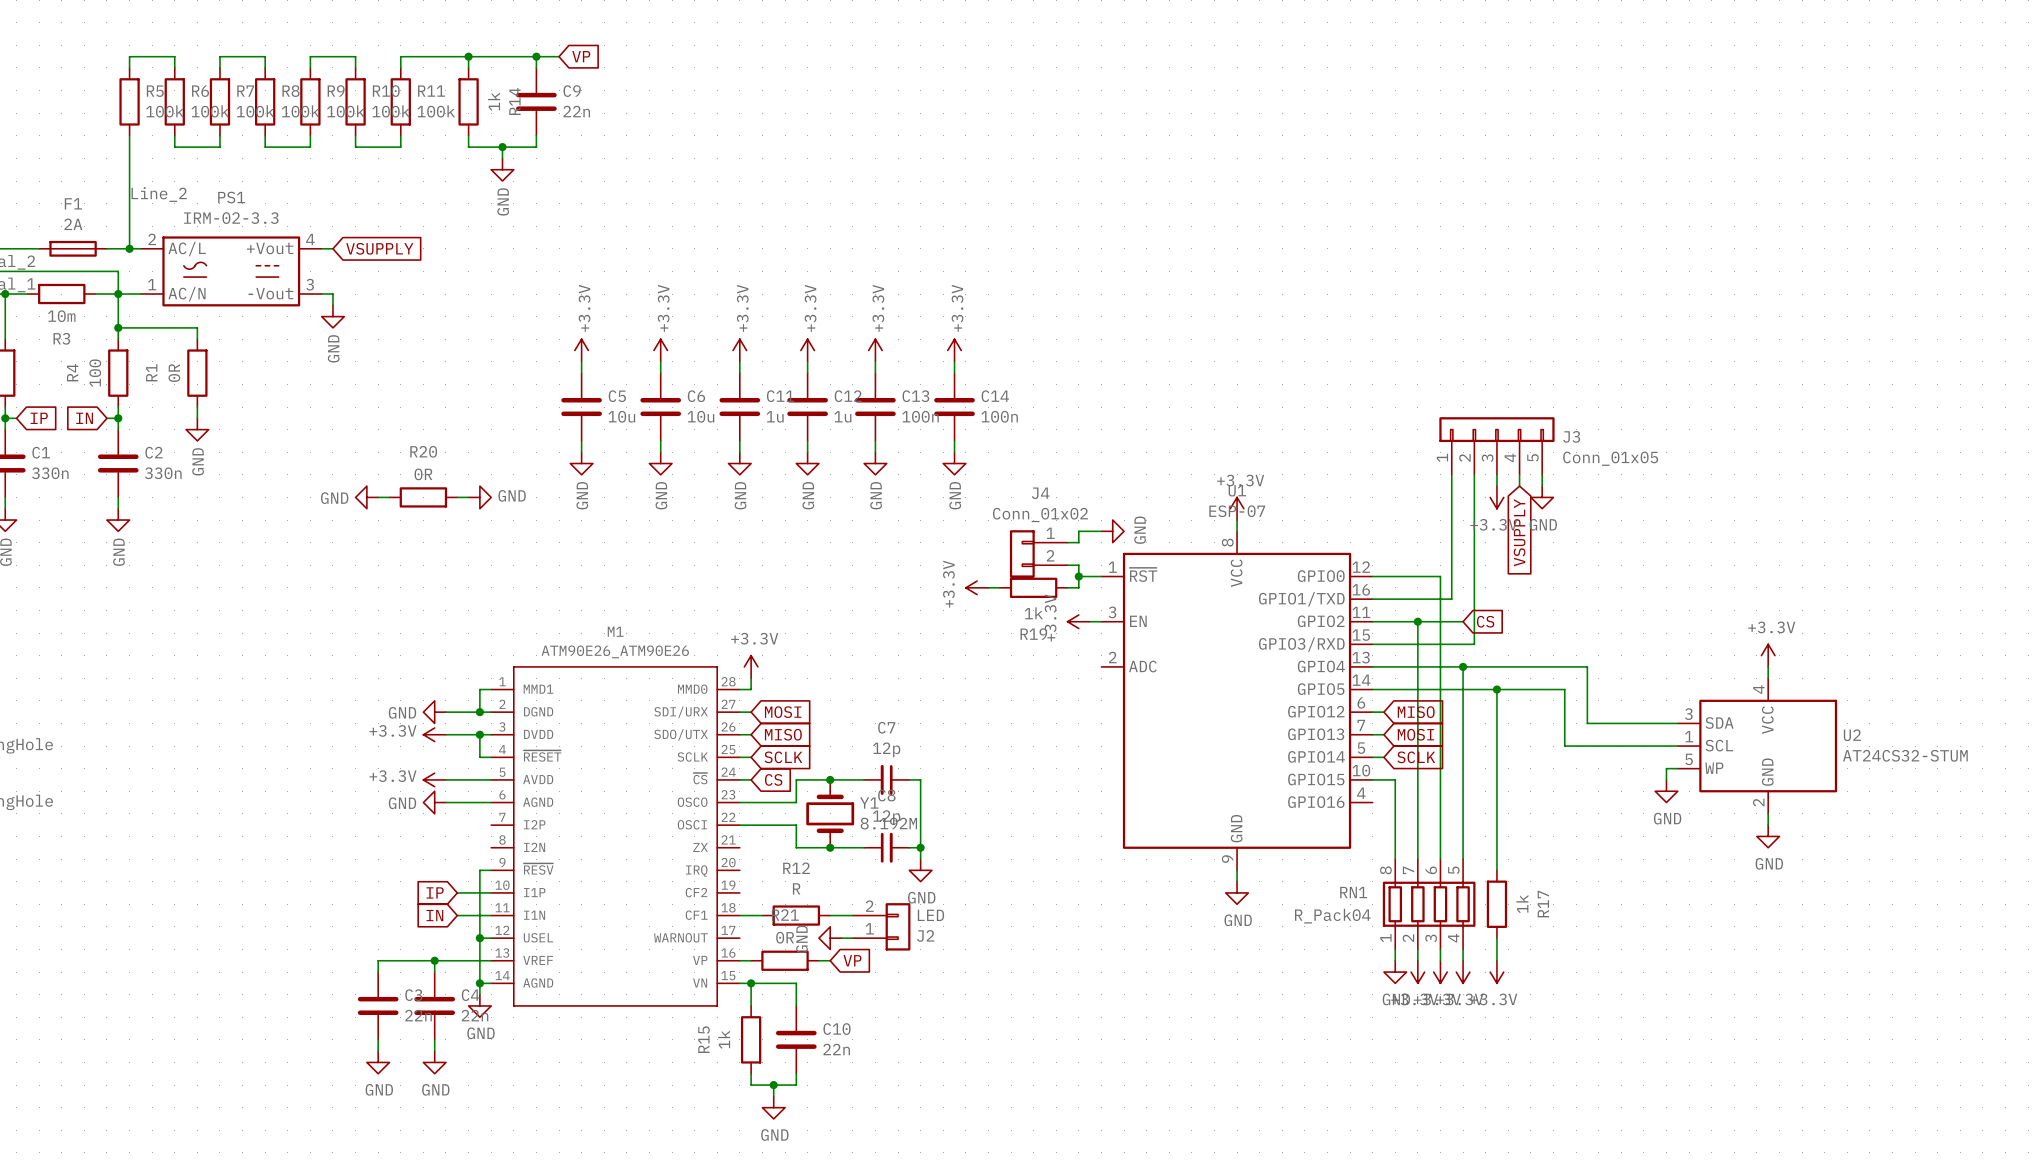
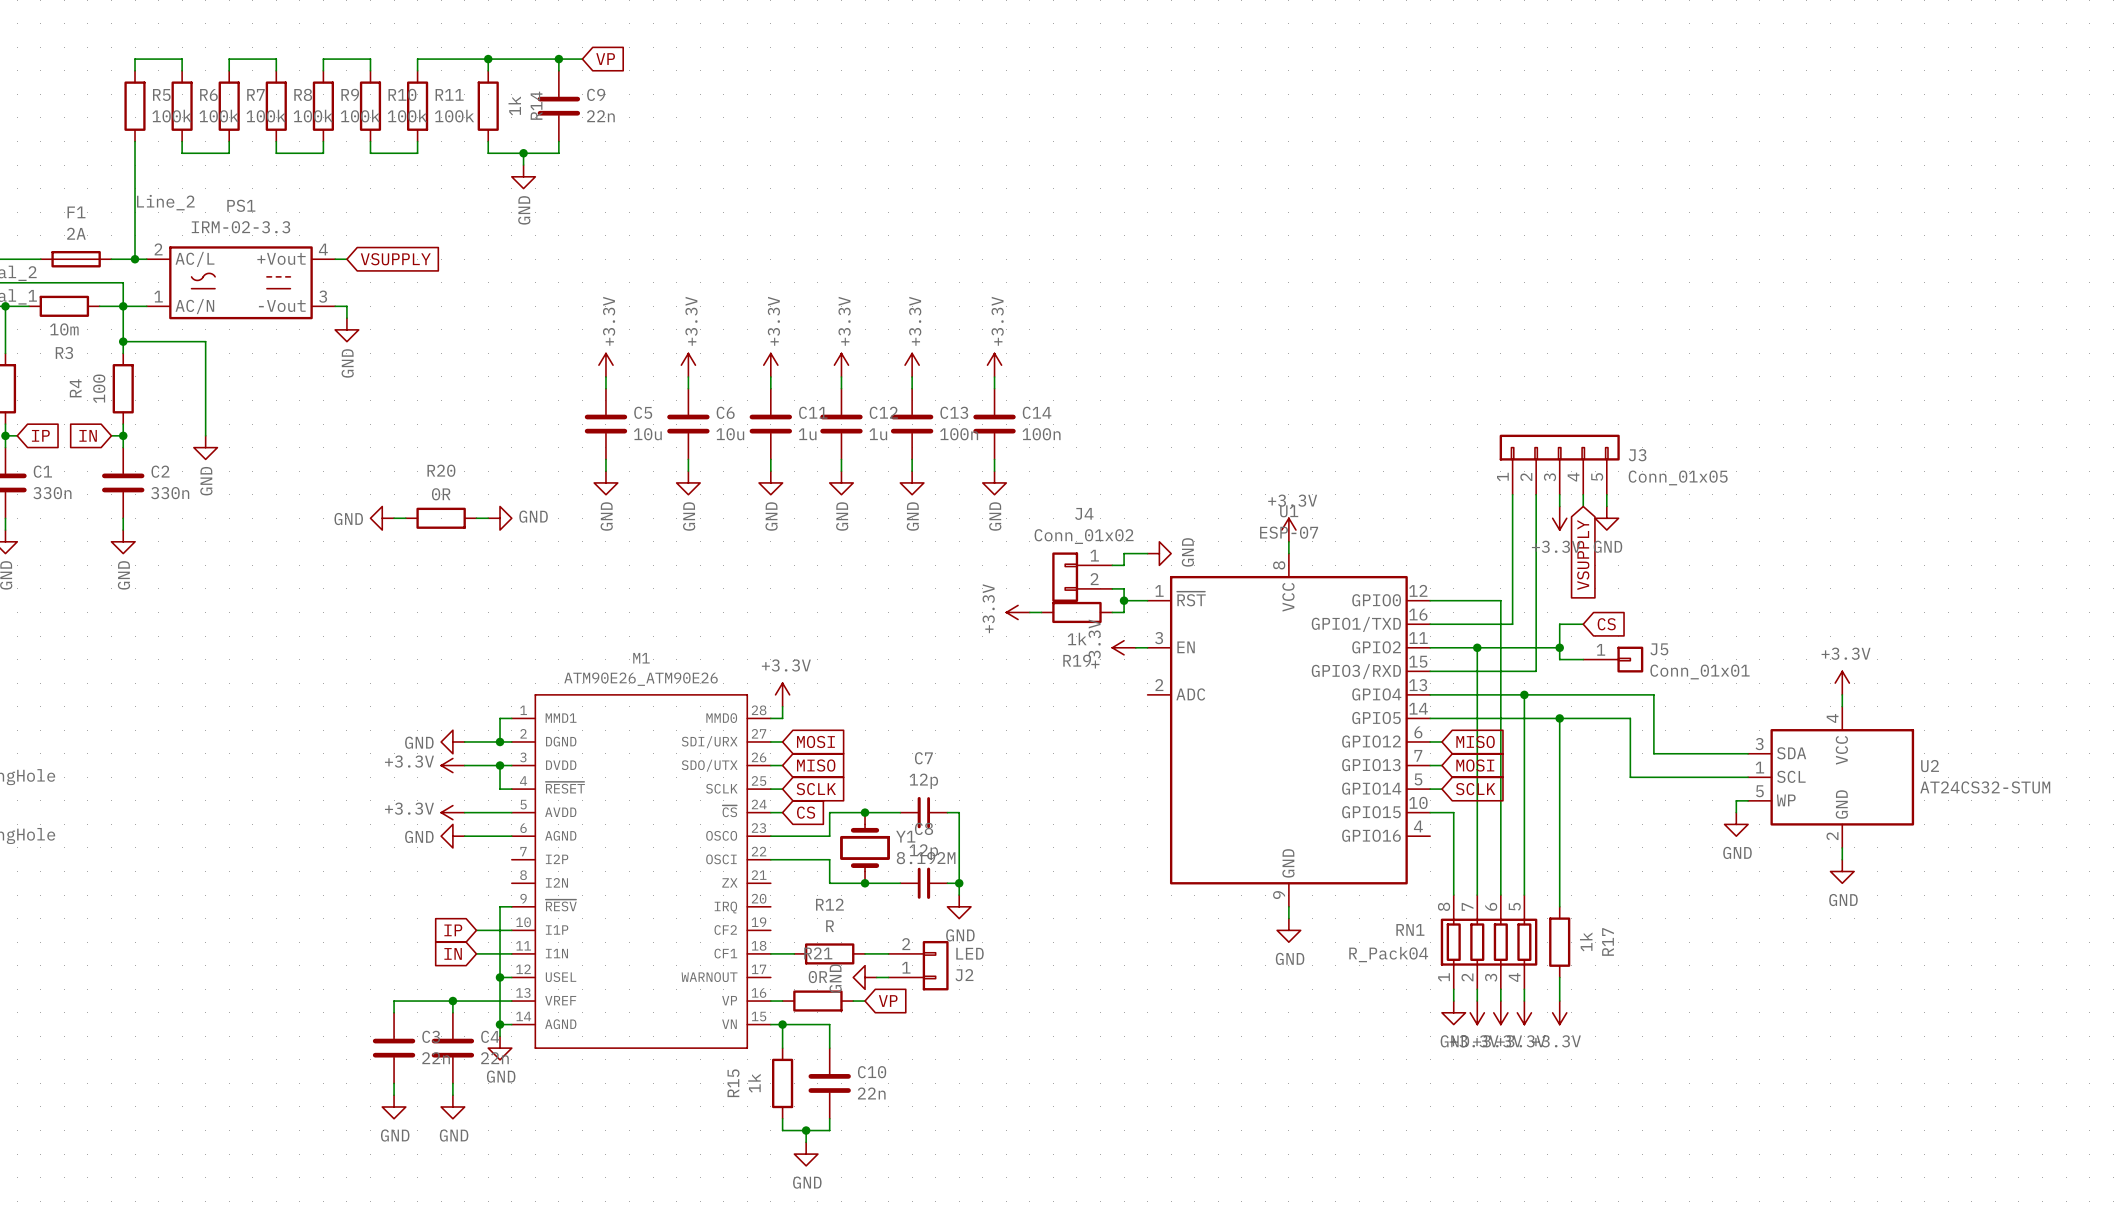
wire: none -> (205, 353) (205, 424)
R1: 0R (197, 373) -> none
wire: none -> (1583, 624) (1559, 624) (1559, 659) (1583, 659)
wire: none -> (1524, 647) (1559, 647)
global label position: CS (1485, 621) -> CS (1606, 624)
junction: none -> (1559, 647)
J5: none -> Conn_01x01 (1613, 659)

